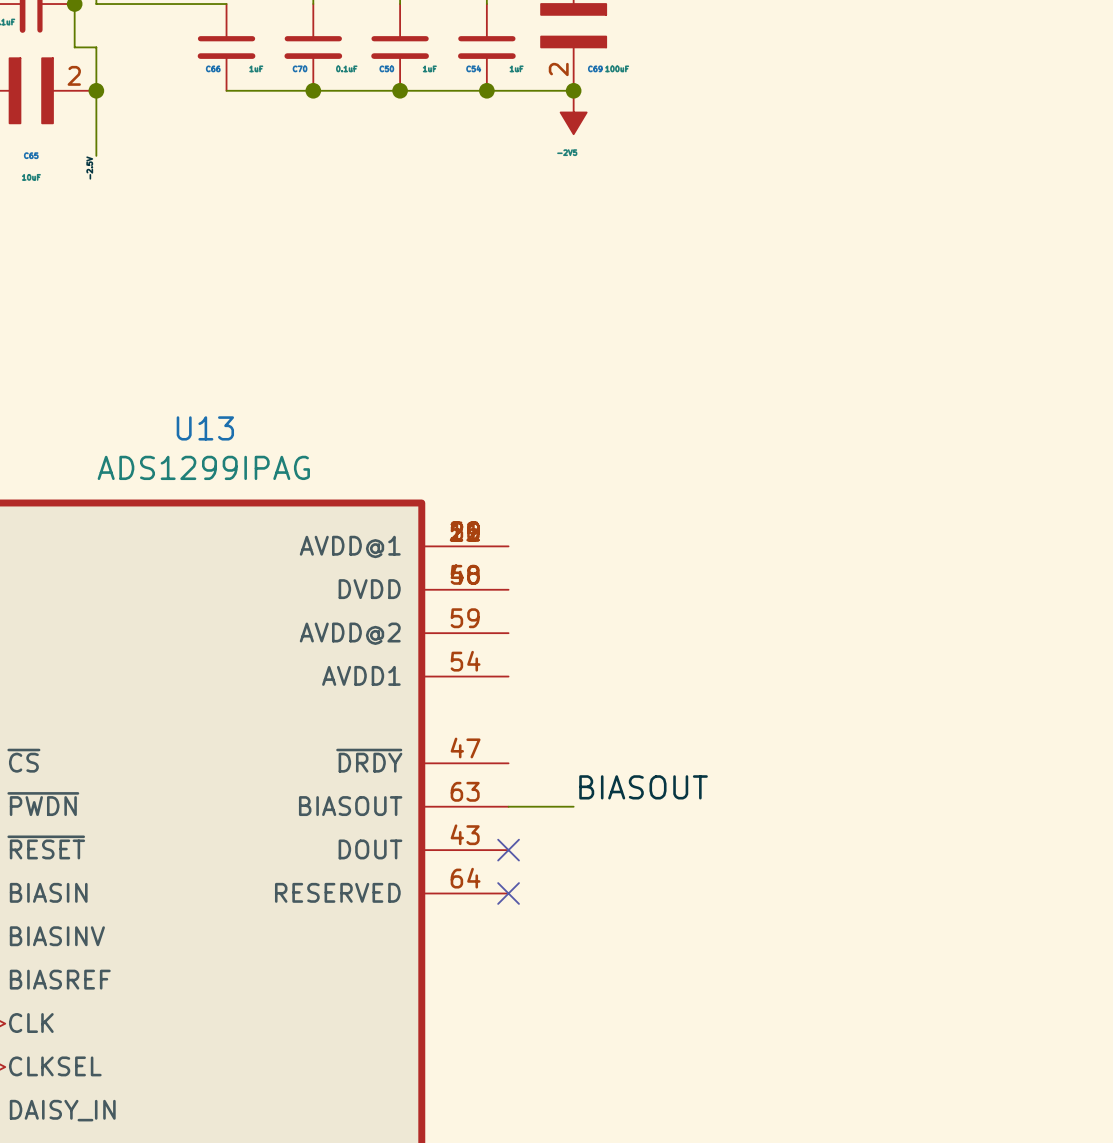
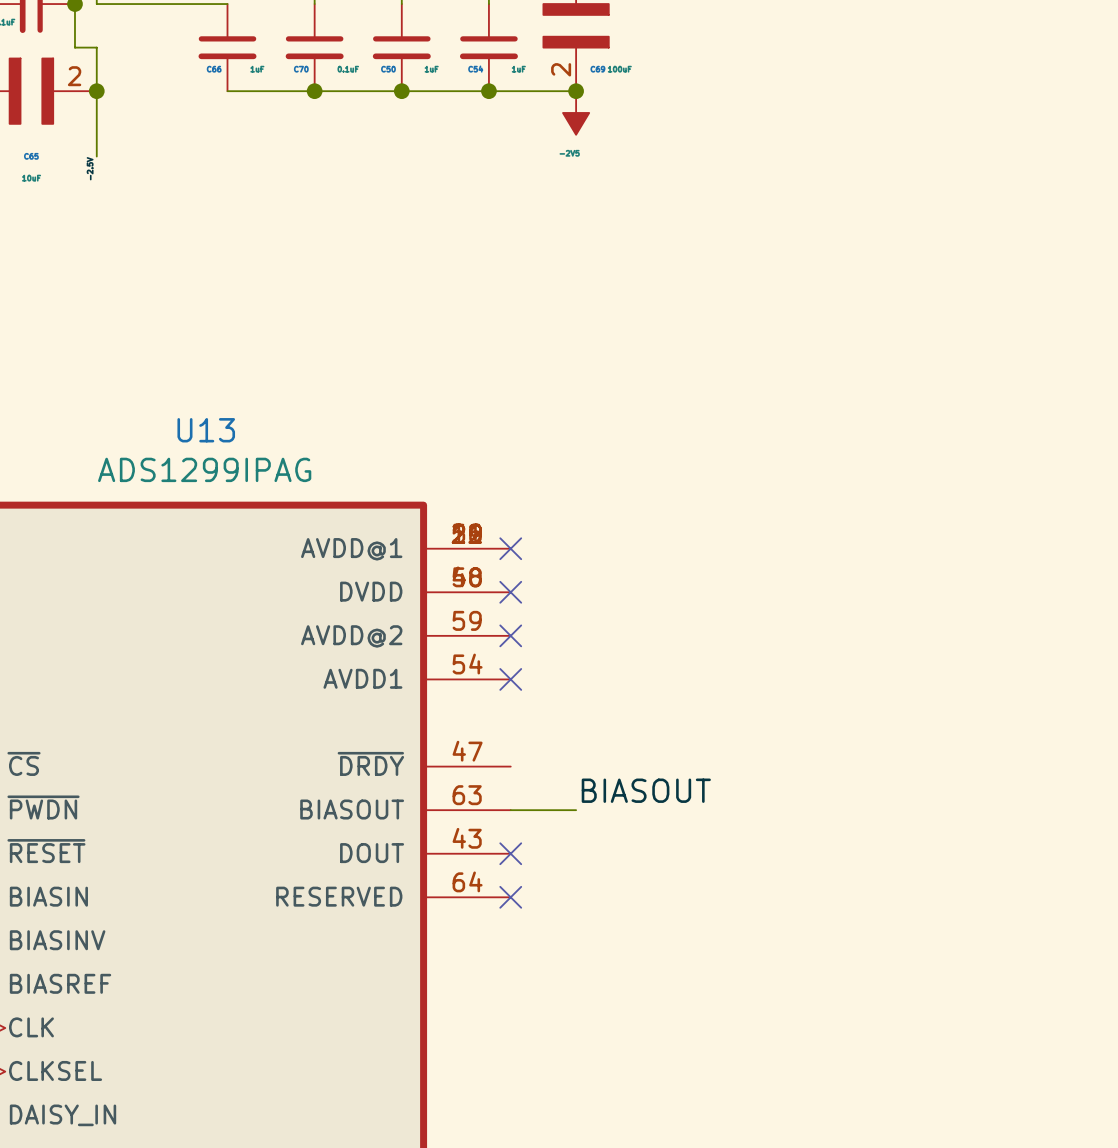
no-connect mark: none -> (510, 548)
no-connect mark: none -> (510, 592)
no-connect mark: none -> (510, 635)
no-connect mark: none -> (510, 679)

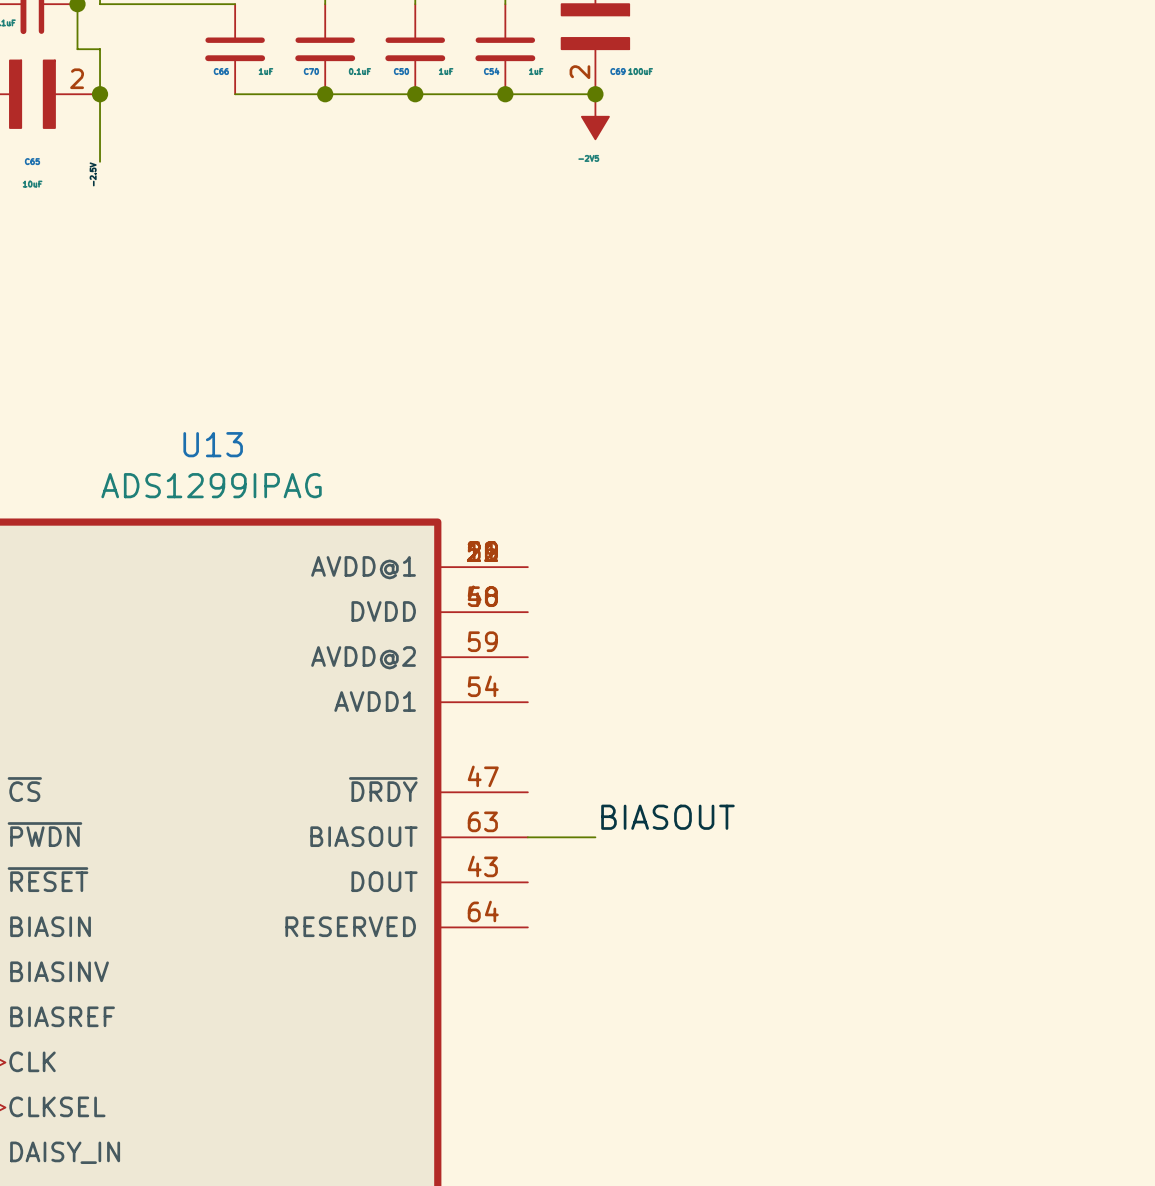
no-connect mark: (510, 548) -> none
no-connect mark: (510, 592) -> none
no-connect mark: (510, 635) -> none
no-connect mark: (510, 679) -> none
no-connect mark: (510, 853) -> none
no-connect mark: (510, 897) -> none

